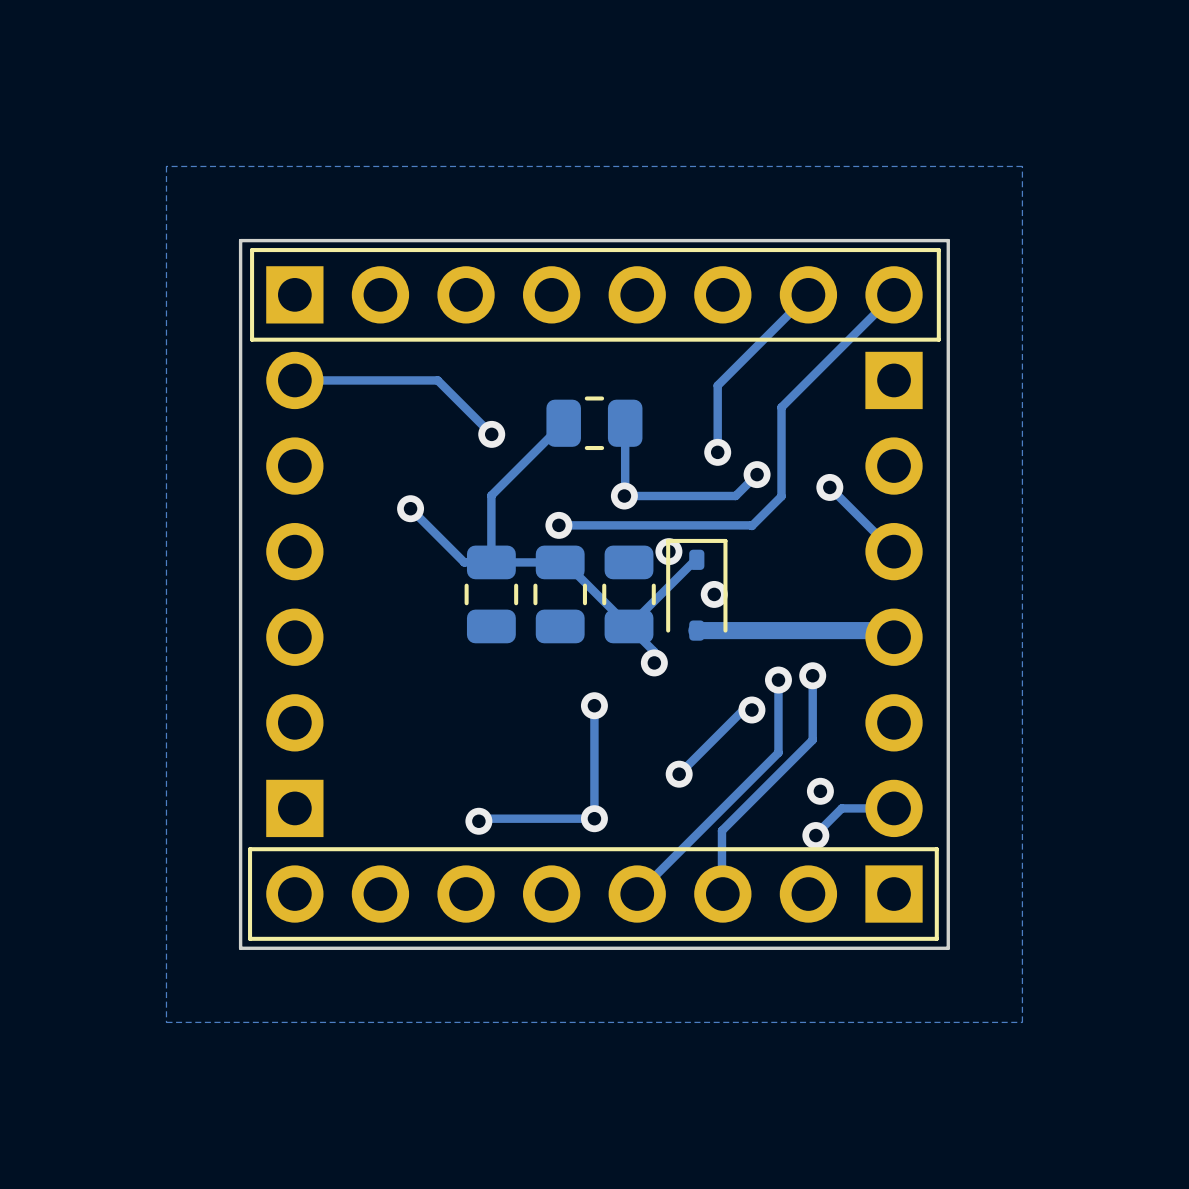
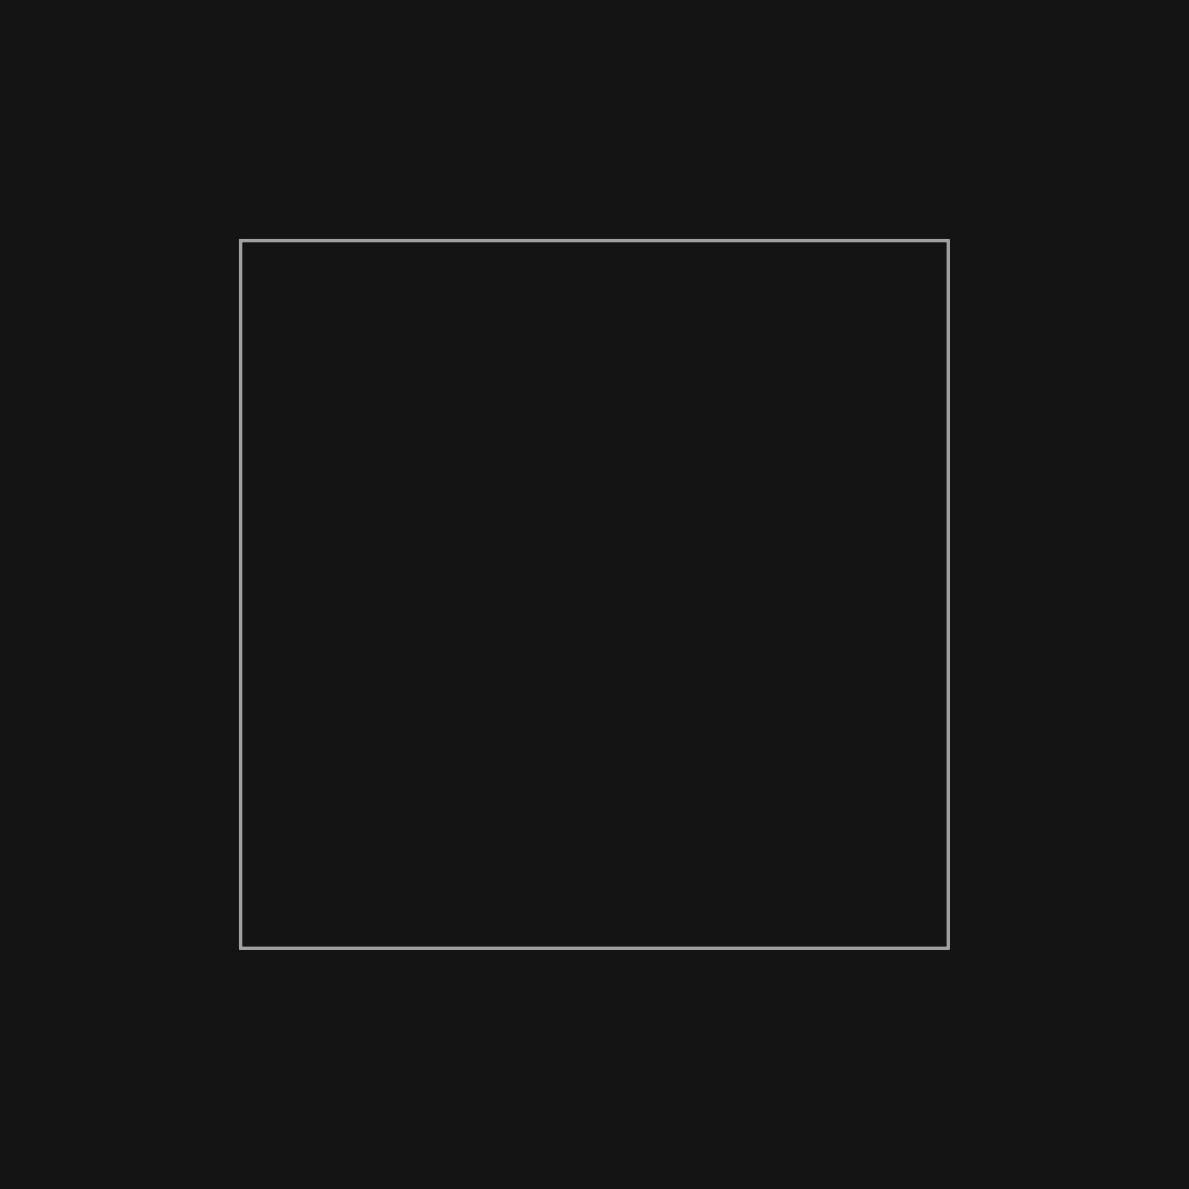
zone outline: (1022, 166) (166, 166) (166, 1022) (1022, 1022) (1022, 166) -> none
part: (595, 294) -> none
track: (808, 294) (717, 385) (717, 452) -> none
track: (894, 294) (781, 407) (781, 496) (751, 525) (558, 525) -> none
track: (294, 380) (437, 380) (491, 434) -> none
track: (563, 423) (491, 495) (491, 562) (494, 559) -> none
part: (594, 423) -> none
track: (625, 423) (624, 496) (735, 496) (757, 474) -> none
via: (491, 434) -> none
via: (717, 452) -> none
via: (757, 474) -> none
track: (829, 487) (894, 551) -> none
via: (829, 487) -> none
via: (624, 496) -> none
track: (410, 508) (464, 562) (564, 562) (654, 651) (654, 662) -> none
via: (410, 508) -> none
via: (558, 525) -> none
via: (668, 551) -> none
track: (696, 559) (629, 626) -> none
part: (696, 589) -> none
part: (294, 594) -> none
part: (491, 594) -> none
part: (560, 594) -> none
part: (629, 594) -> none
via: (714, 594) -> none
part: (894, 594) -> none
track: (696, 630) (887, 630) (894, 637) -> none
via: (654, 662) -> none
track: (812, 675) (812, 740) (721, 830) (722, 894) -> none
via: (812, 675) -> none
track: (778, 680) (778, 752) (637, 894) -> none
via: (778, 680) -> none
via: (594, 705) -> none
track: (598, 705) (594, 705) (594, 818) (481, 818) (478, 821) -> none
track: (751, 709) (743, 709) (679, 774) -> none
via: (751, 709) -> none
via: (679, 774) -> none
via: (820, 791) -> none
track: (894, 808) (841, 808) (815, 835) -> none
via: (594, 818) -> none
via: (478, 821) -> none
via: (815, 835) -> none
part: (593, 894) -> none

